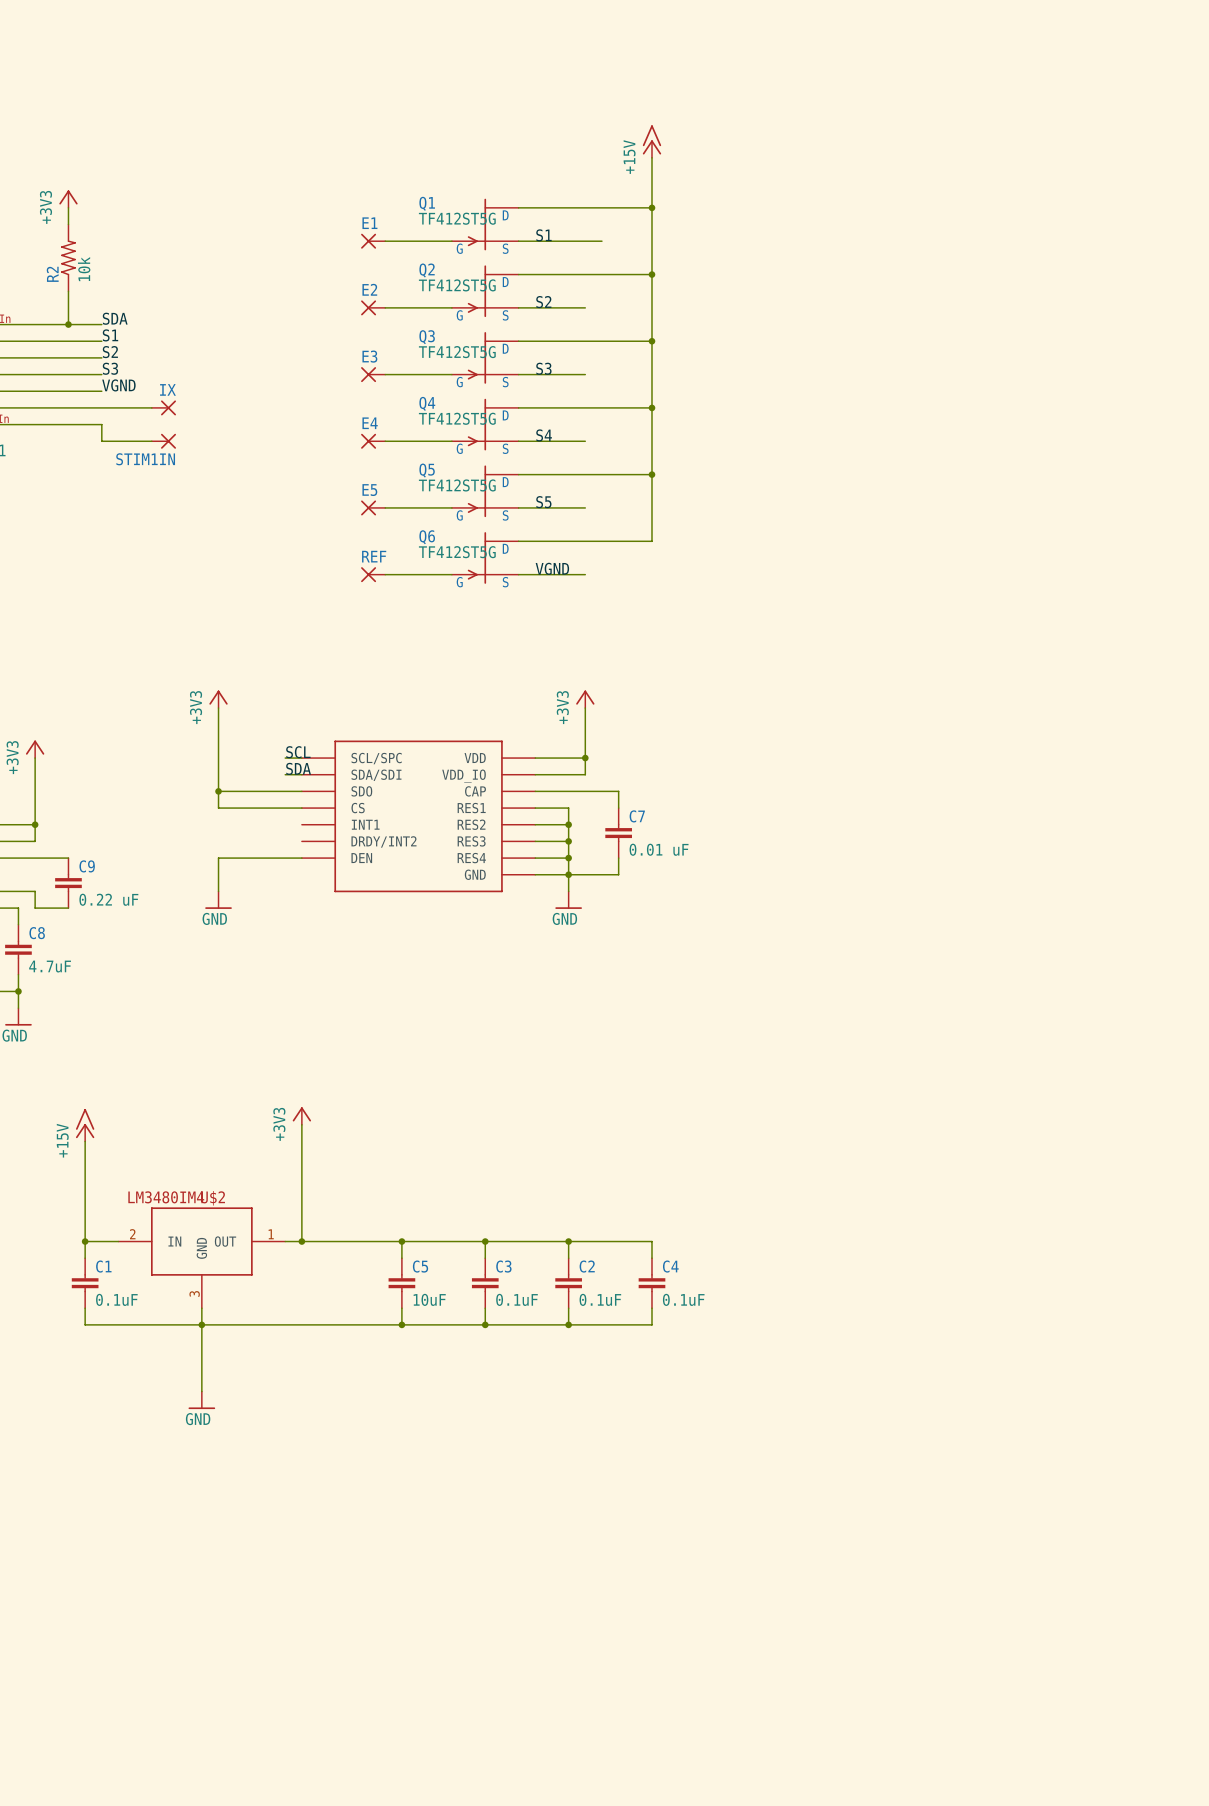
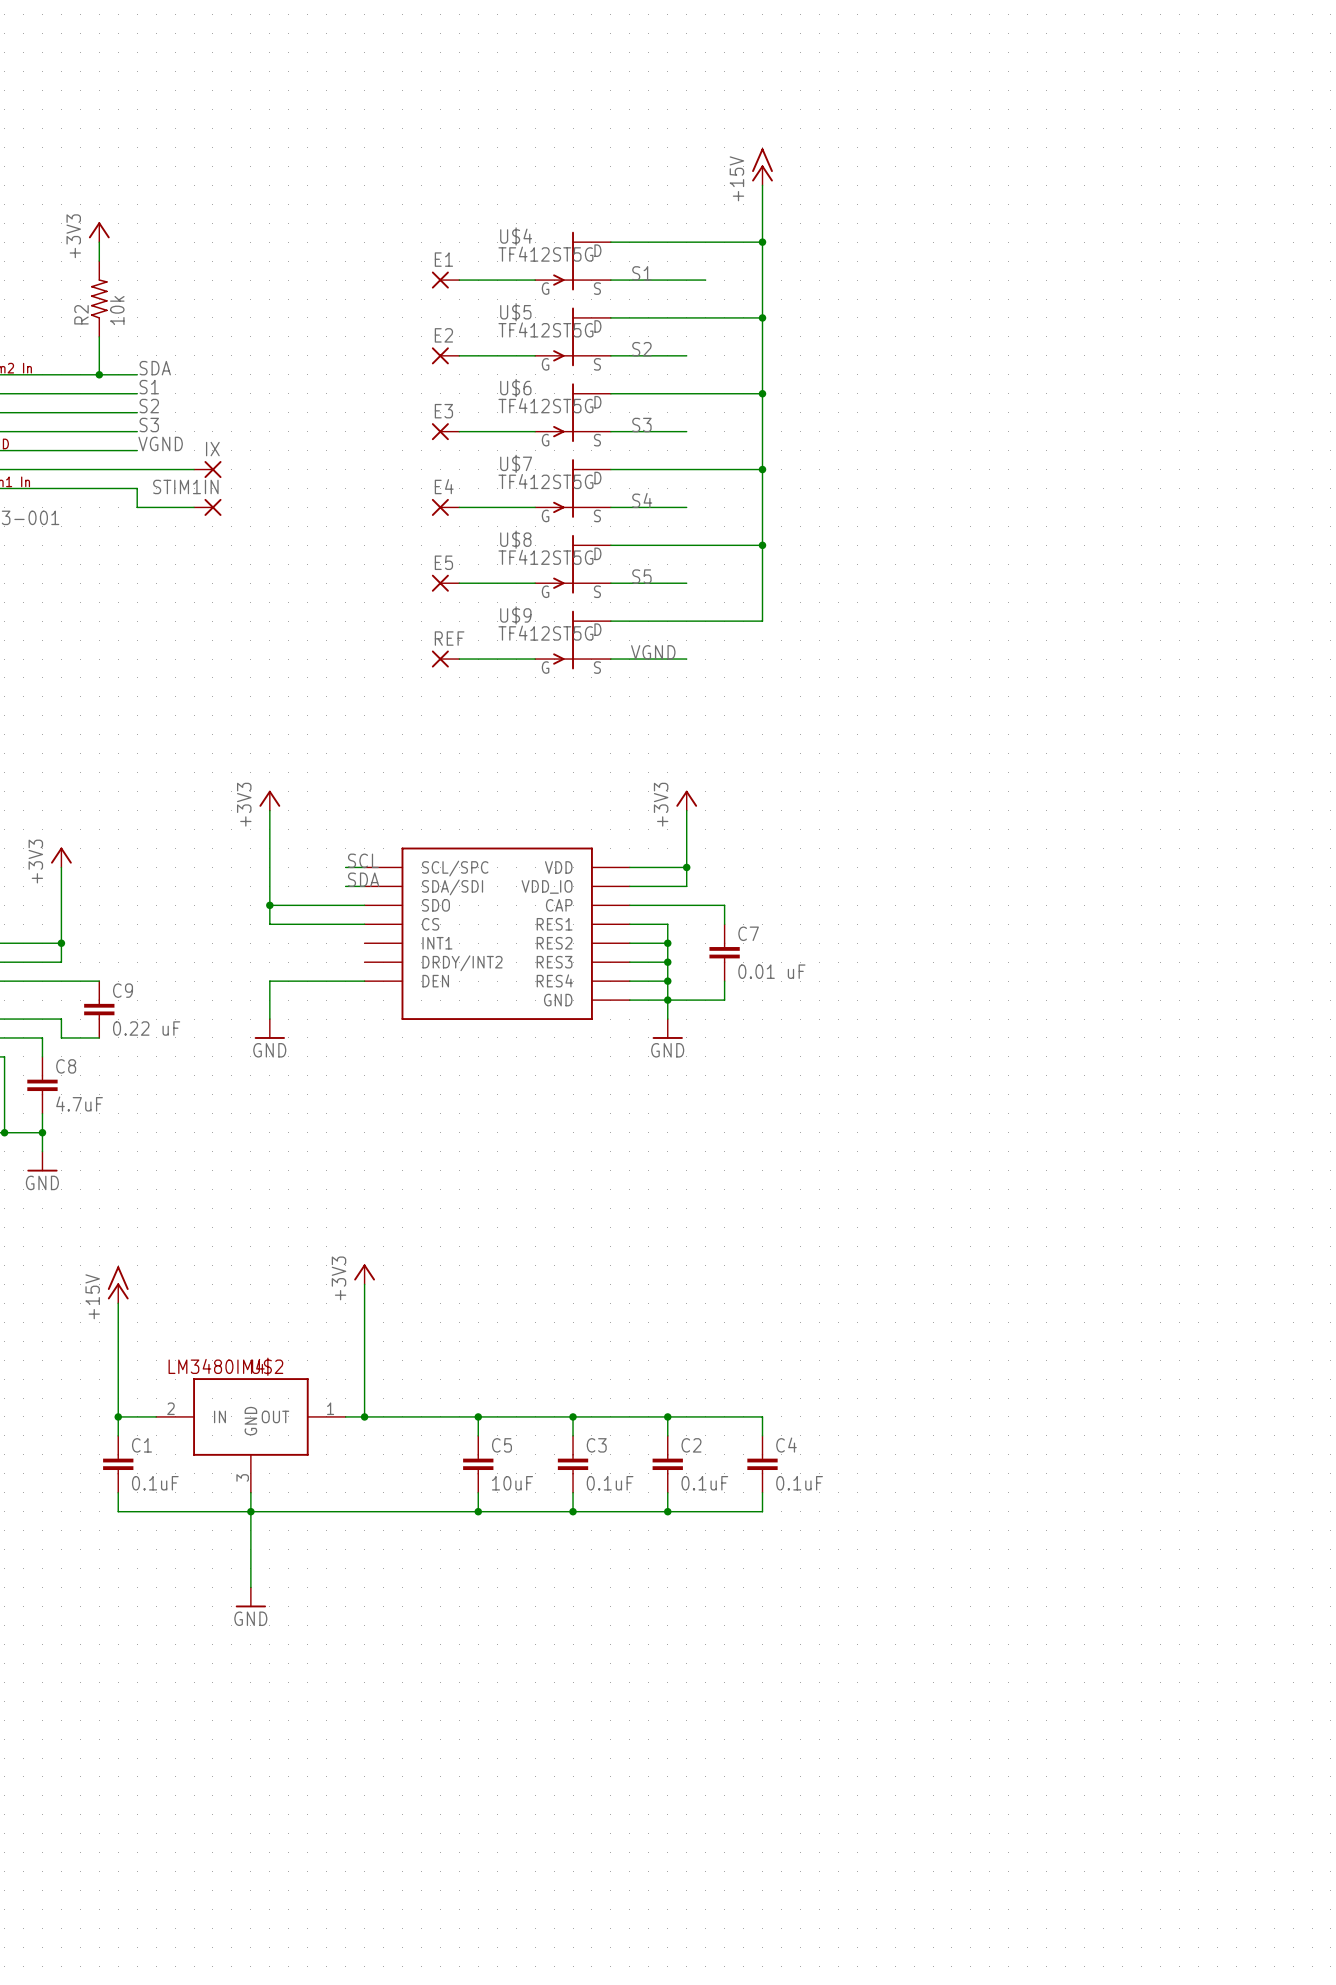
Q1 name: Q1 (427, 203) -> U$4 (516, 236)
Q2 name: Q2 (427, 270) -> U$5 (515, 312)
Q3 name: Q3 (427, 337) -> U$6 (515, 388)
Q4 name: Q4 (427, 403) -> U$7 (516, 463)
STIM1IN name position: STIM1IN (145, 459) -> STIM1IN (185, 486)
Q5 name: Q5 (427, 470) -> U$8 (515, 539)
Q6 name: Q6 (427, 537) -> U$9 (515, 615)

